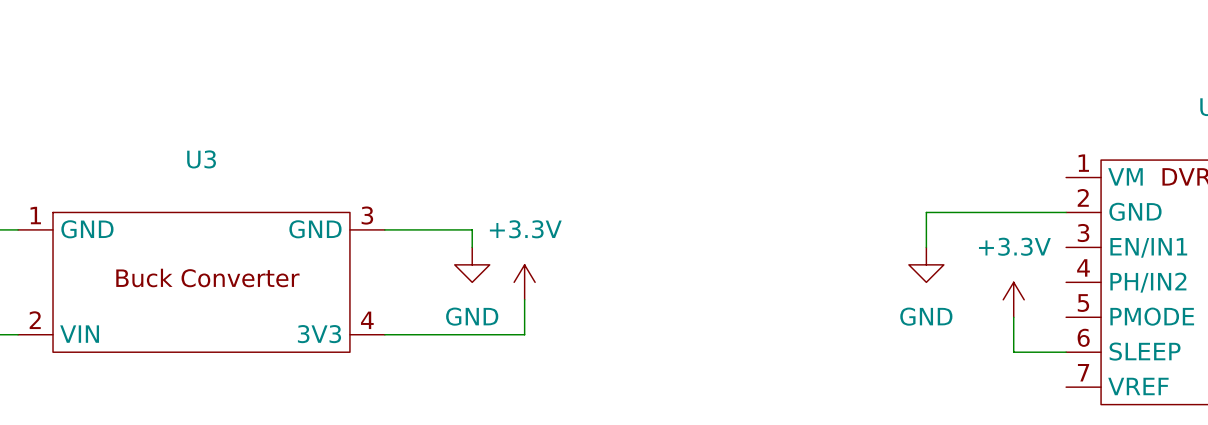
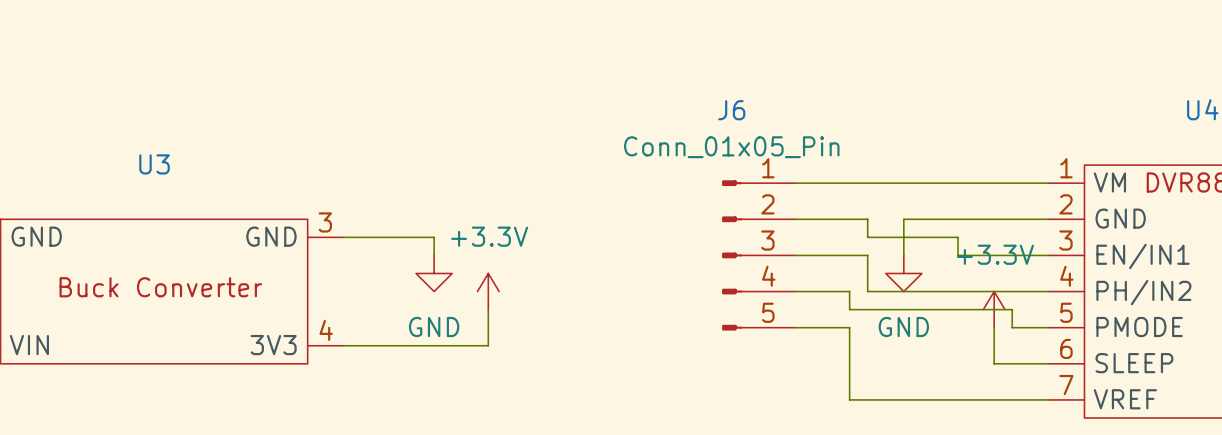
wire: none -> (795, 183) (1048, 183)
wire: none -> (795, 219) (867, 219) (867, 237) (958, 237) (958, 255) (1048, 255)
J6: none -> Conn_01x05_Pin (758, 255)
wire: none -> (795, 255) (867, 255) (867, 291) (1048, 291)
wire: none -> (795, 291) (849, 291) (849, 309) (1012, 309) (1012, 327) (1048, 327)
wire: none -> (795, 327) (849, 327) (849, 399) (1048, 399)

